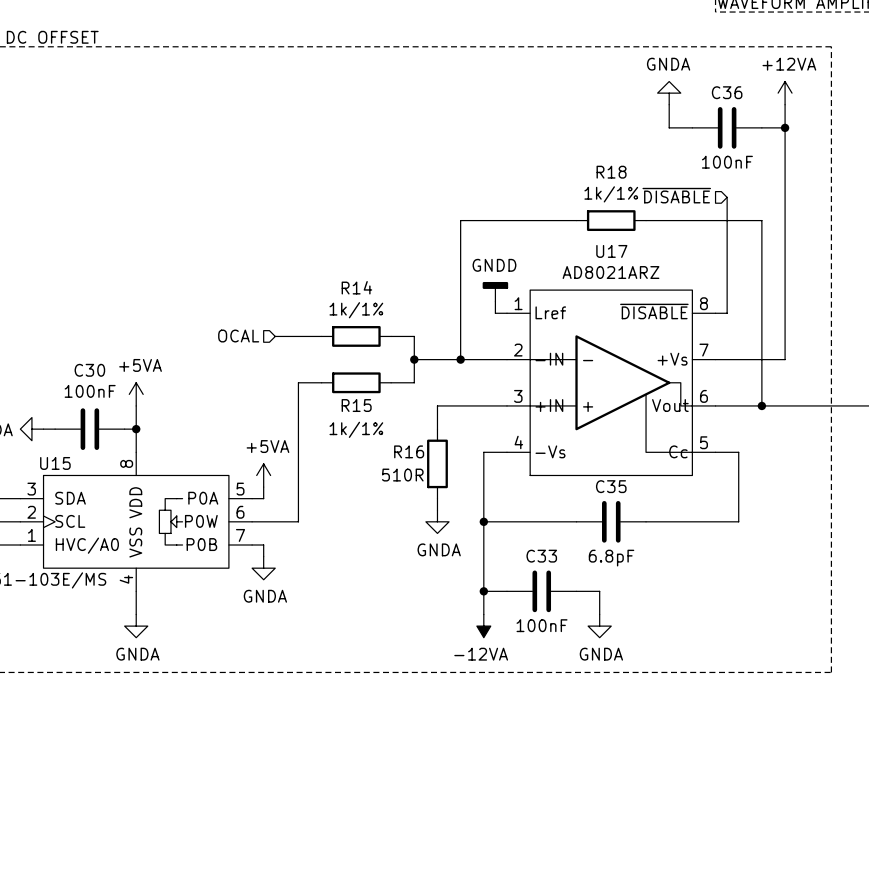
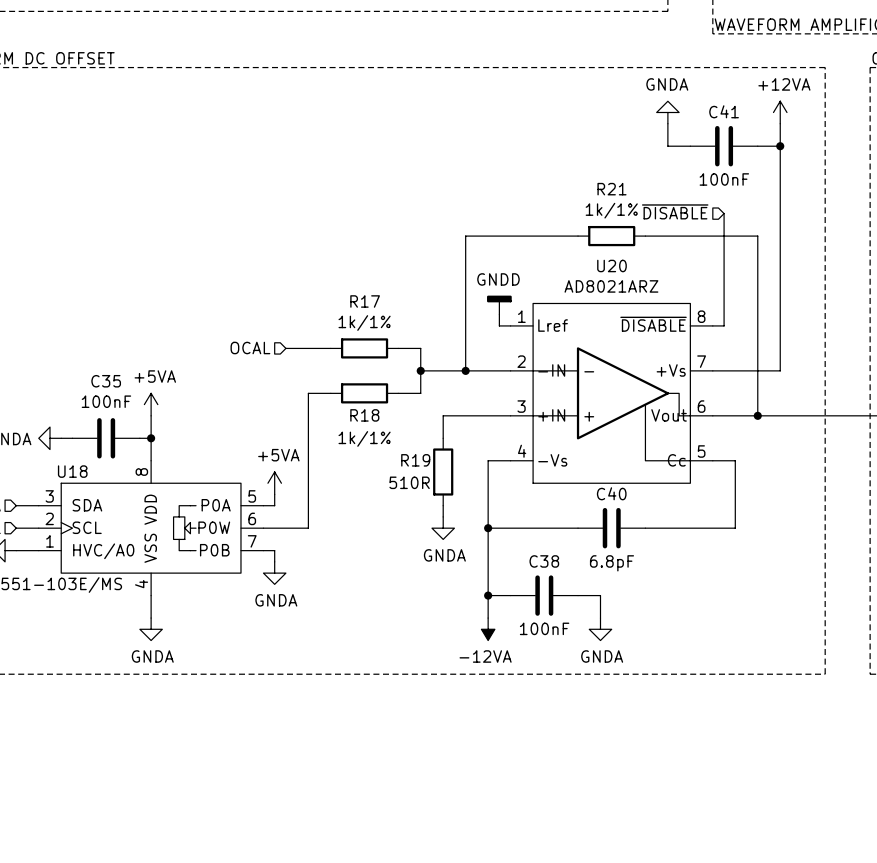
C36 name: C36 (727, 92) -> C41 (724, 111)
R18 name: R18 (611, 172) -> R21 (611, 189)
U17 name: U17 (611, 251) -> U20 (611, 265)
R14 name: R14 (356, 287) -> R17 (365, 301)
C30 name: C30 (89, 370) -> C35 (106, 381)
R15 name: R15 (356, 405) -> R18 (364, 415)
R16 name: R16 (409, 451) -> R19 (415, 460)
U15 name: U15 (55, 463) -> U18 (72, 471)
C35 name: C35 (611, 486) -> C40 (611, 493)
C33 name: C33 (541, 556) -> C38 (544, 561)

